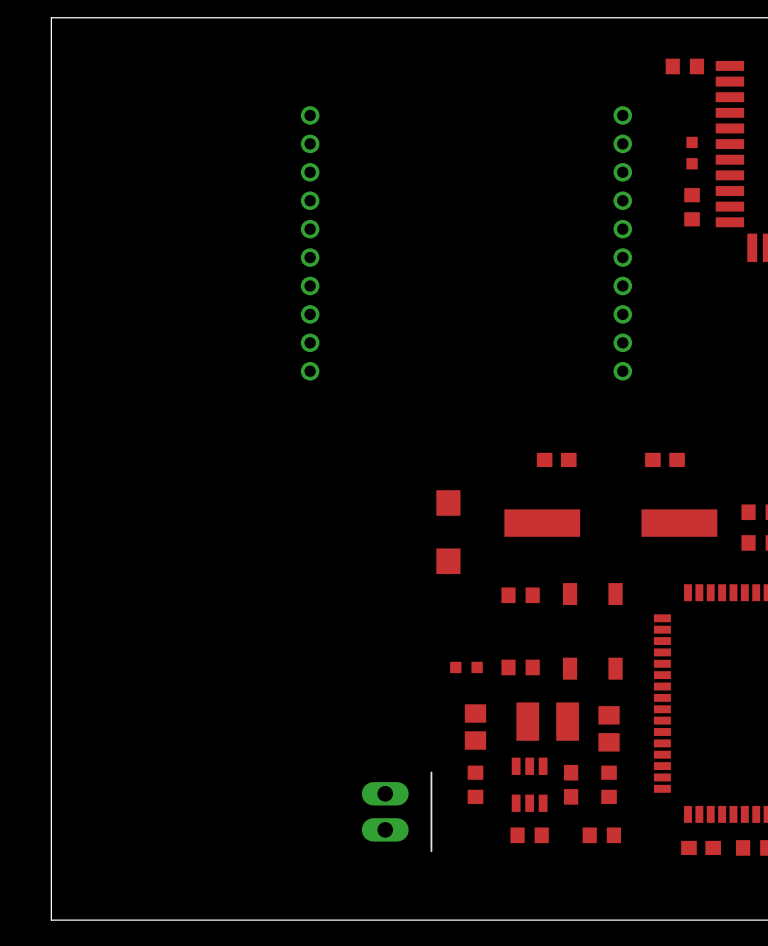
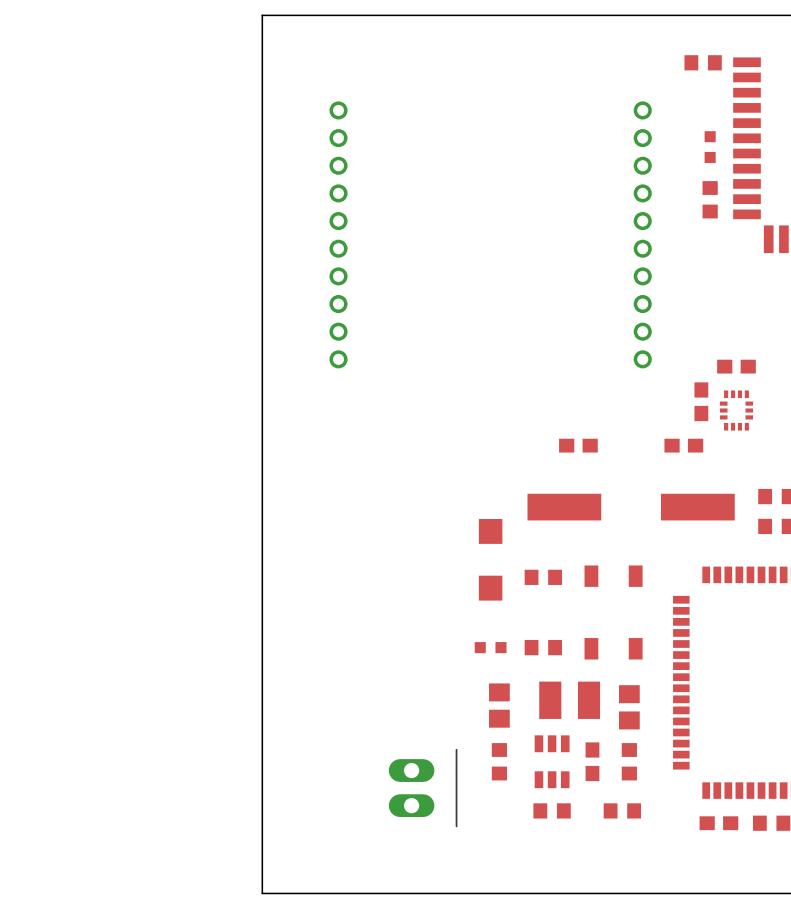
board edge: (231, 17) (51, 17) (51, 920) (231, 920) -> (262, 15) (262, 893)
part: none -> (736, 366)
part: none -> (701, 401)
part: none -> (736, 410)
part position: (448, 532) -> (490, 559)

